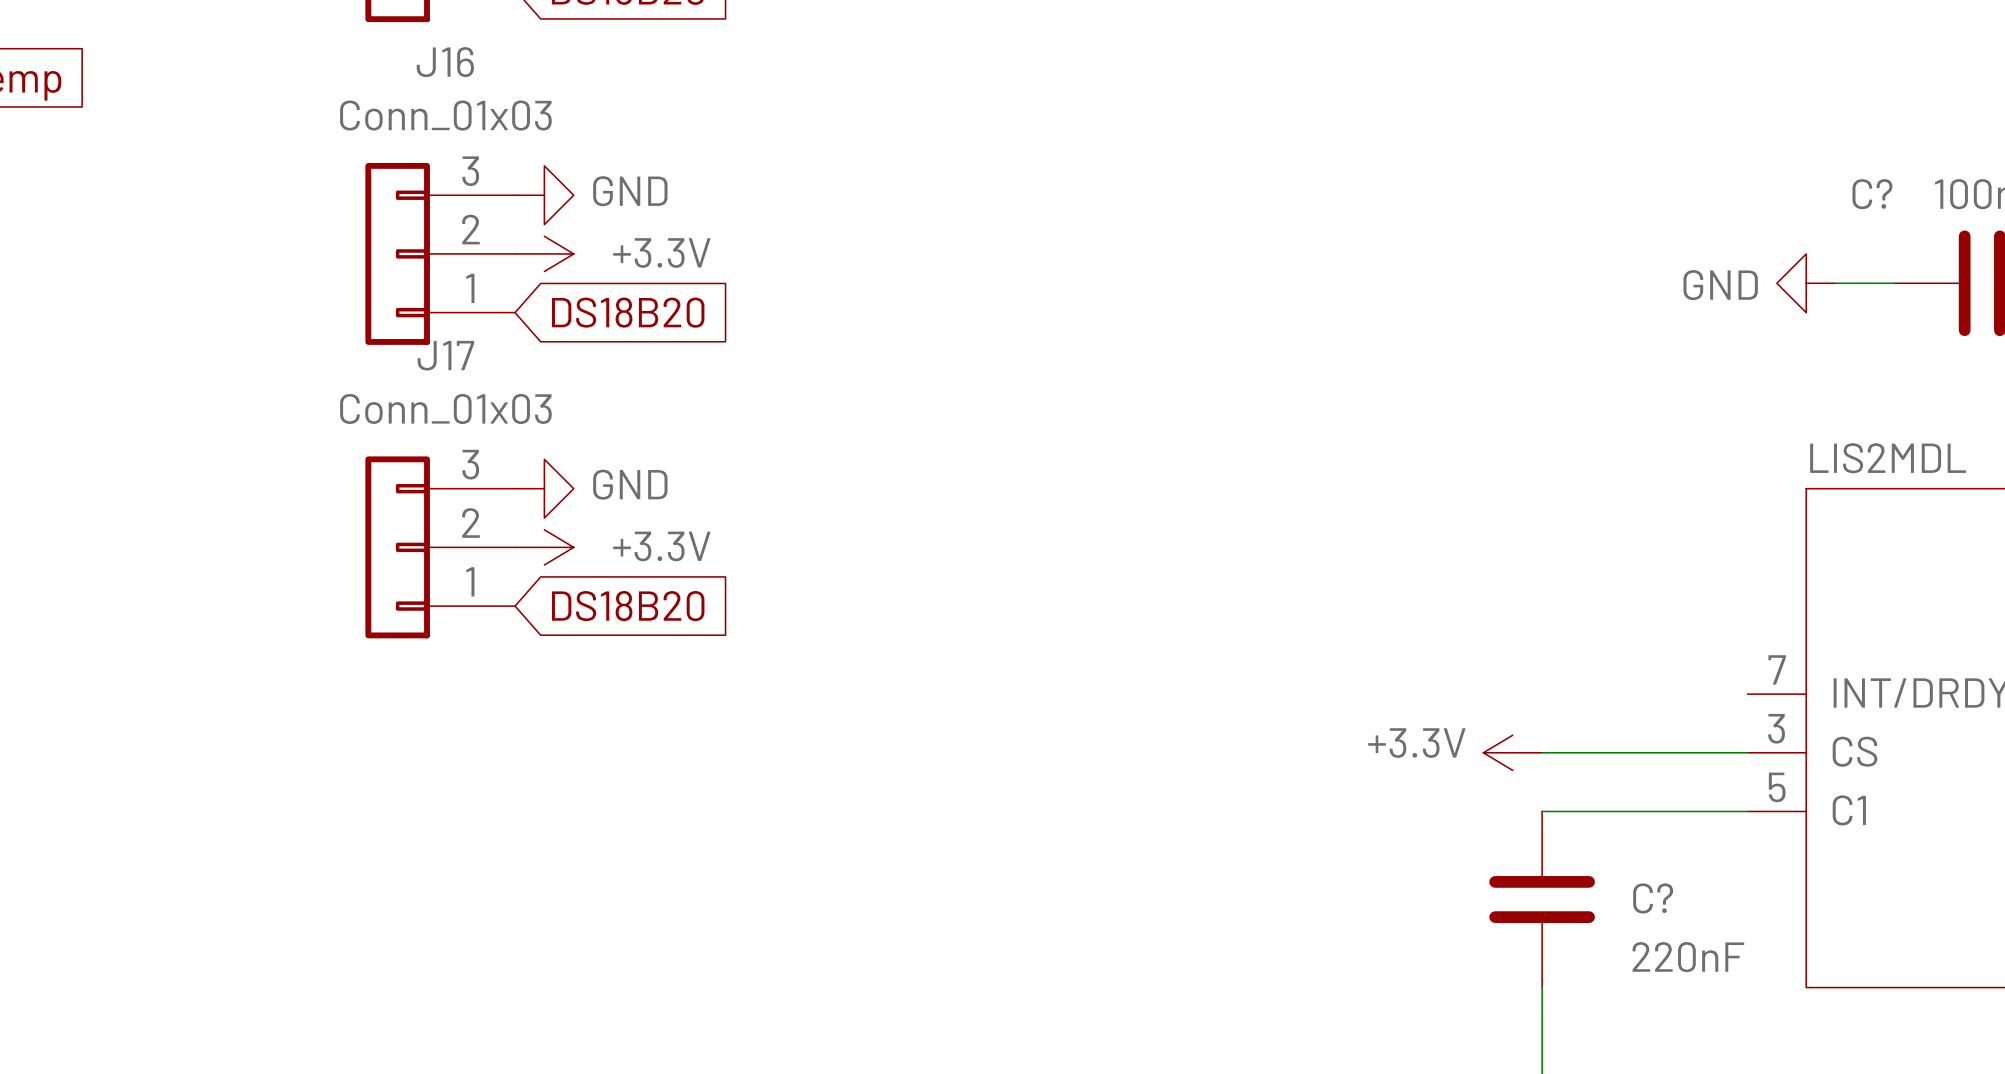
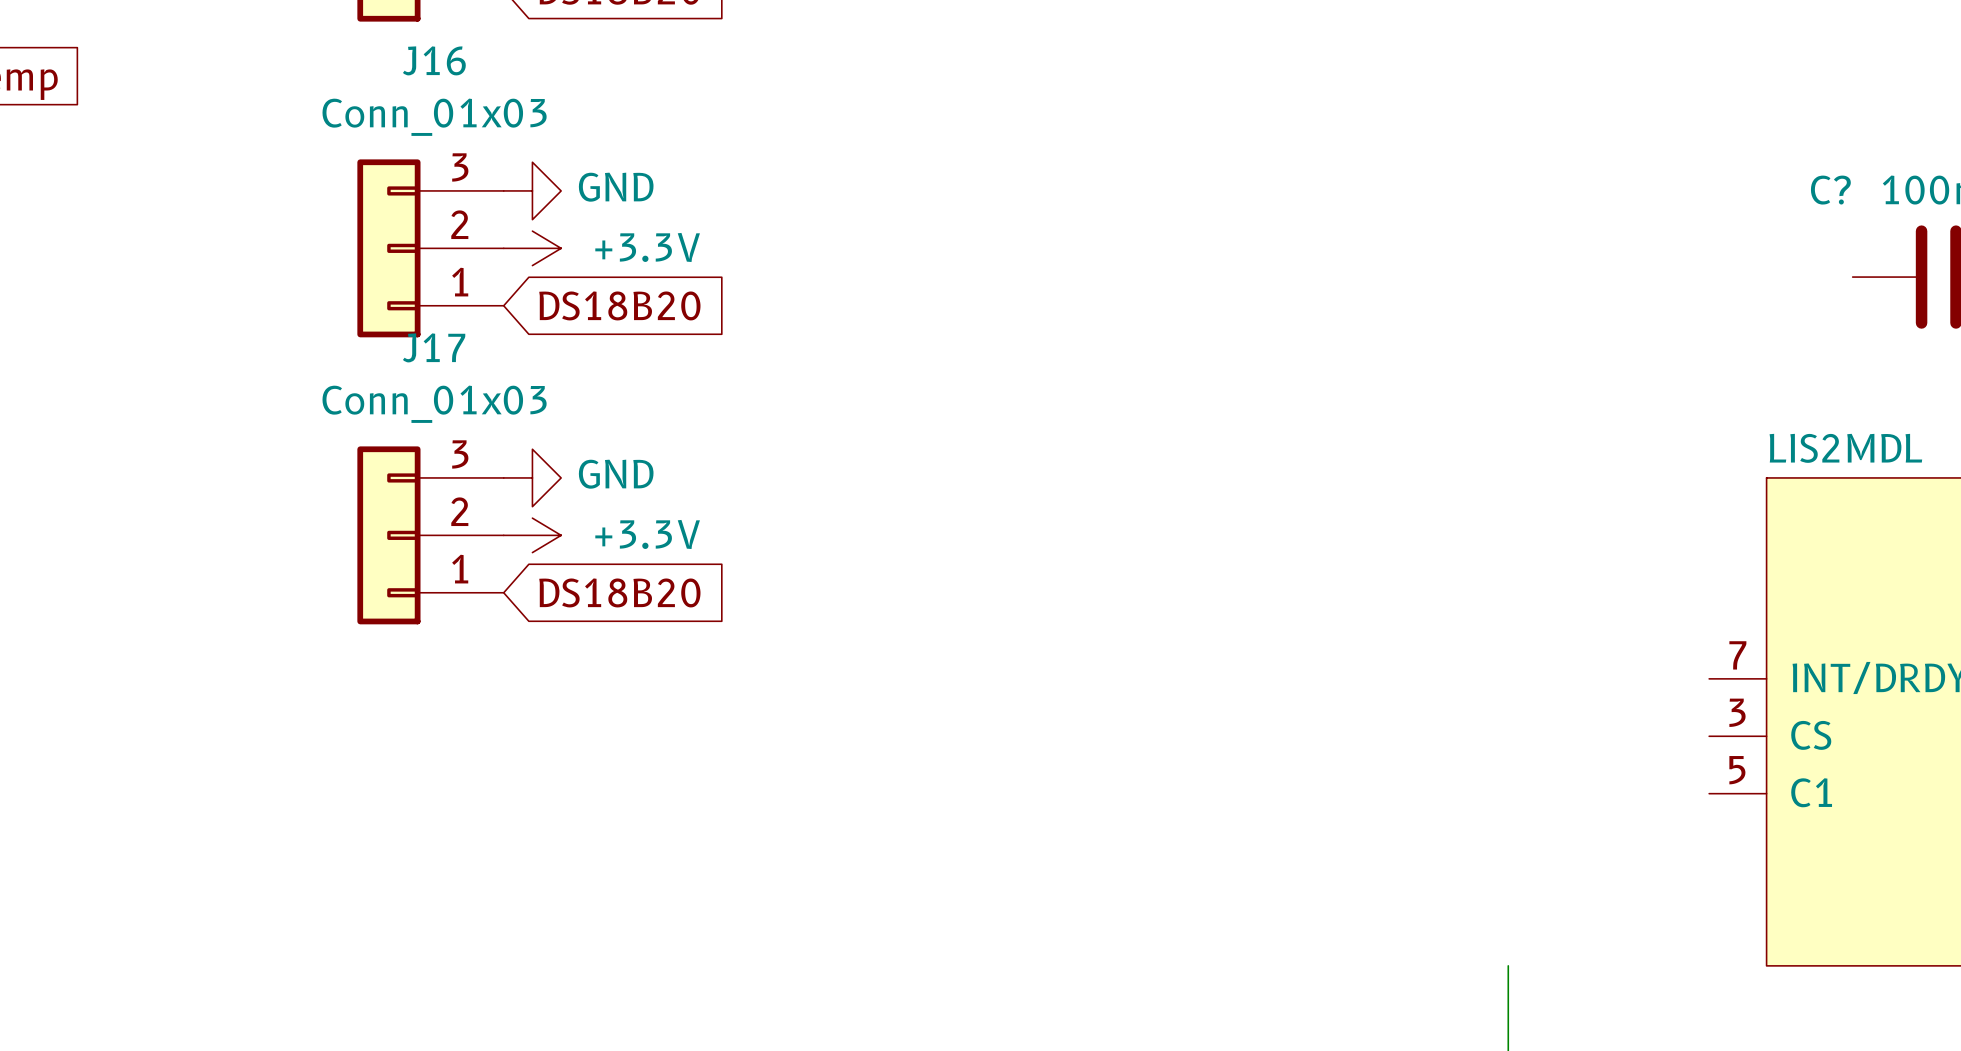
power symbol: GND (1806, 283) -> none
wire: (1835, 283) (1894, 283) -> none
power symbol: +3.3V (1512, 752) -> none
wire: (1542, 752) (1747, 752) -> none
wire: (1542, 811) (1747, 811) -> none
C?: 220nF (1542, 899) -> none

